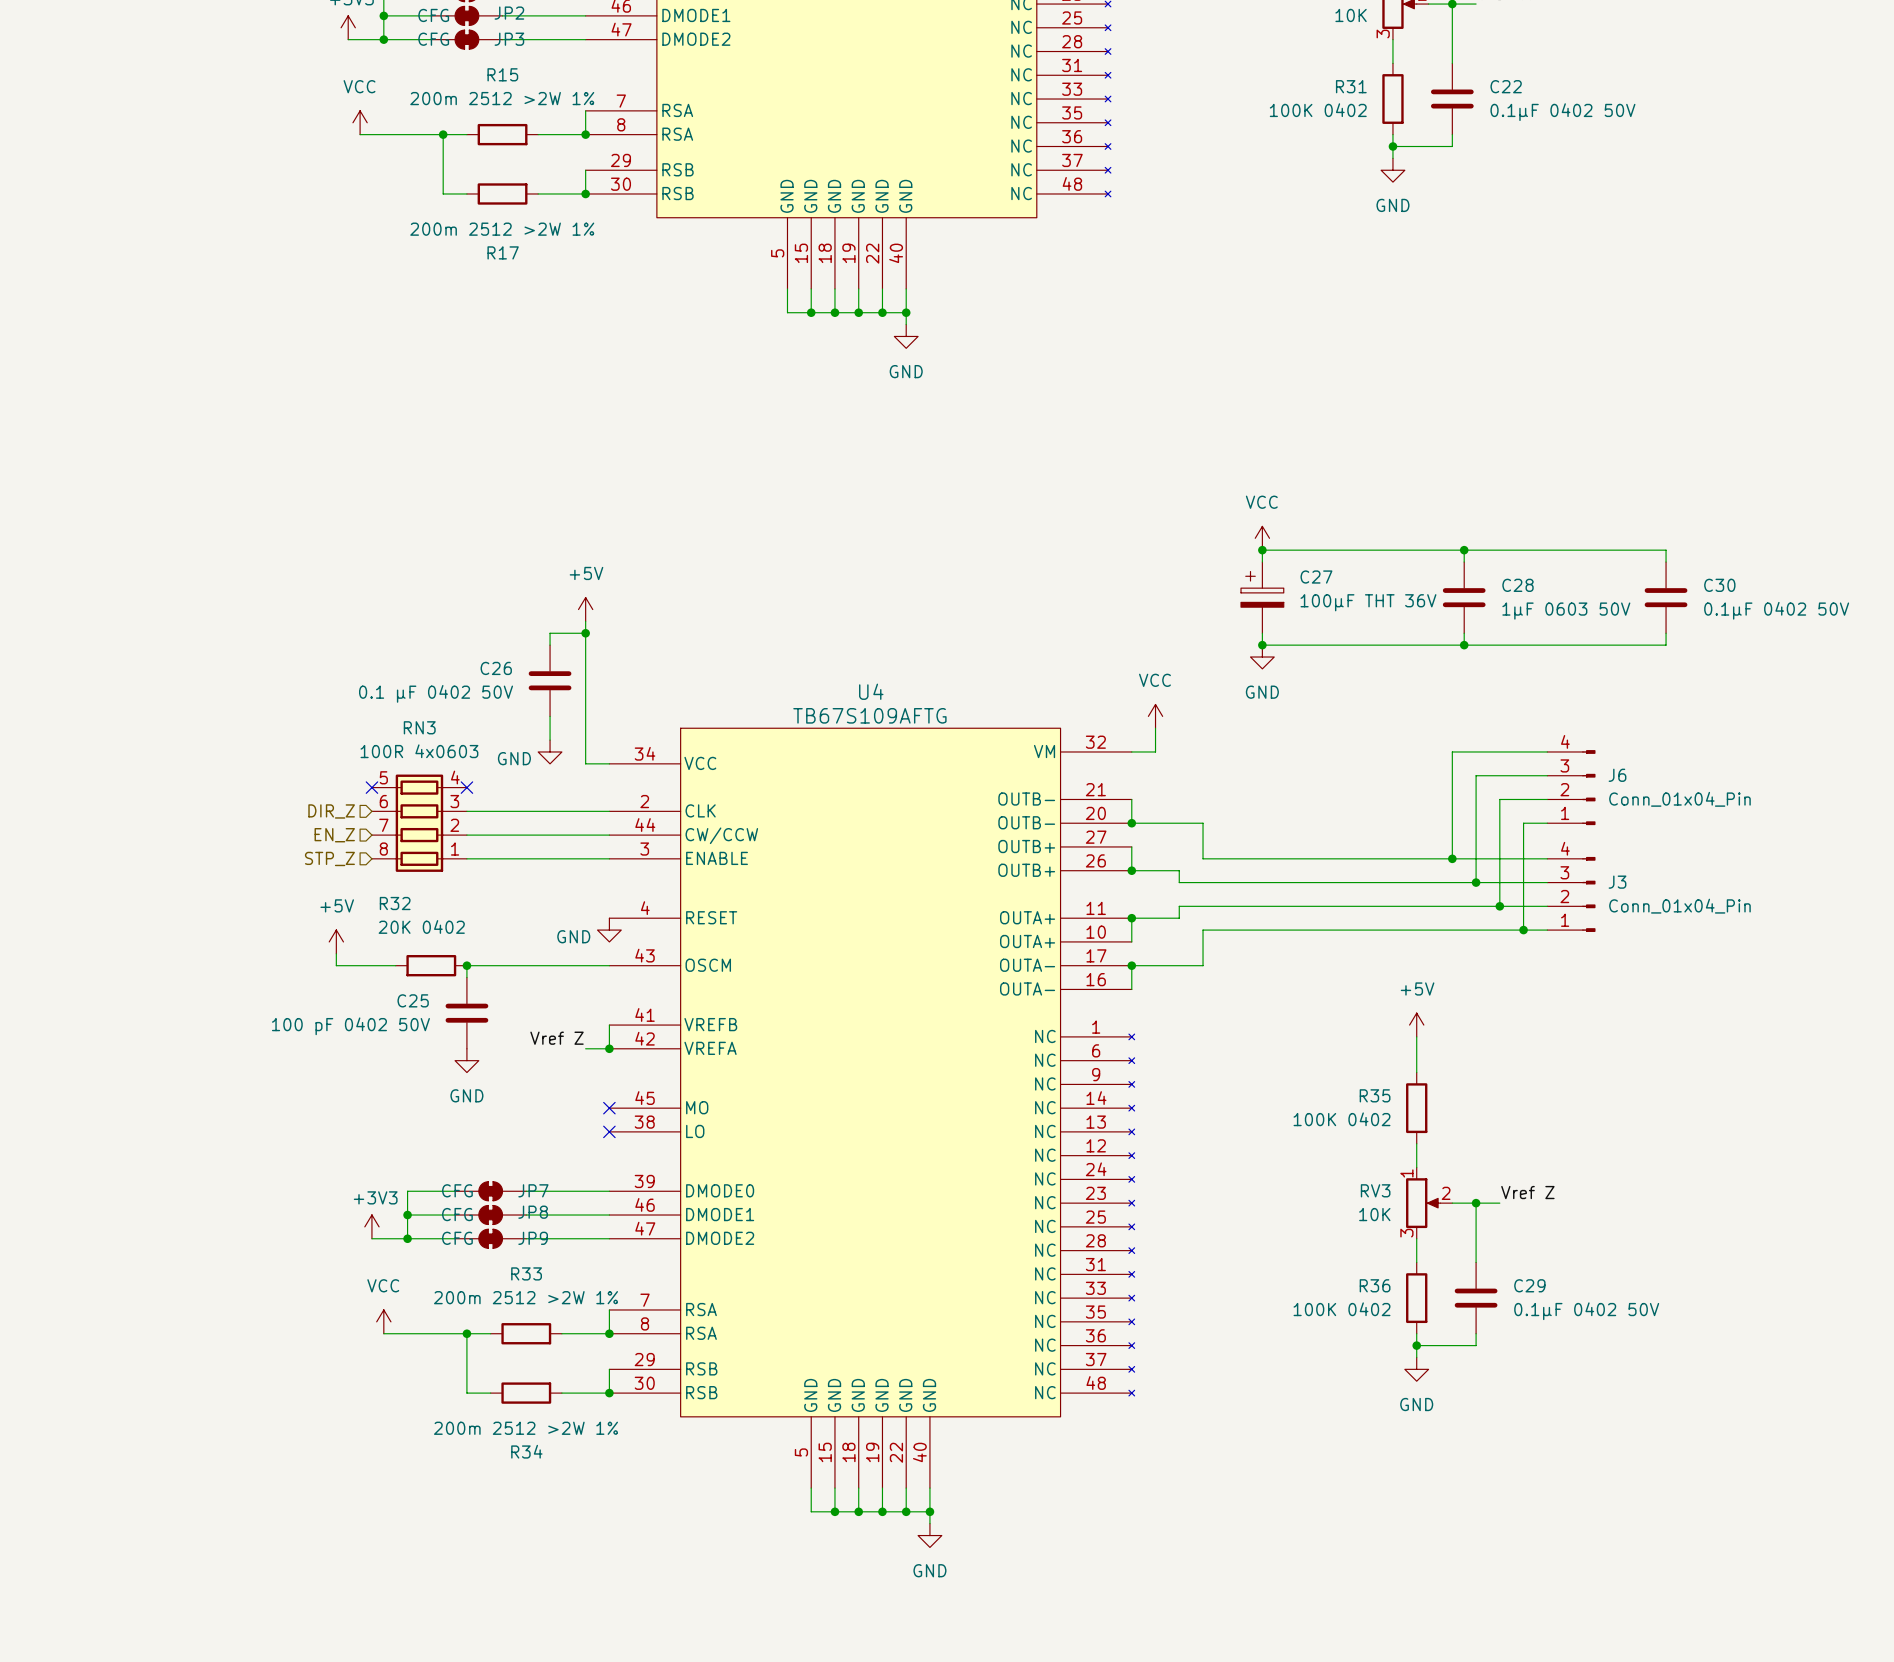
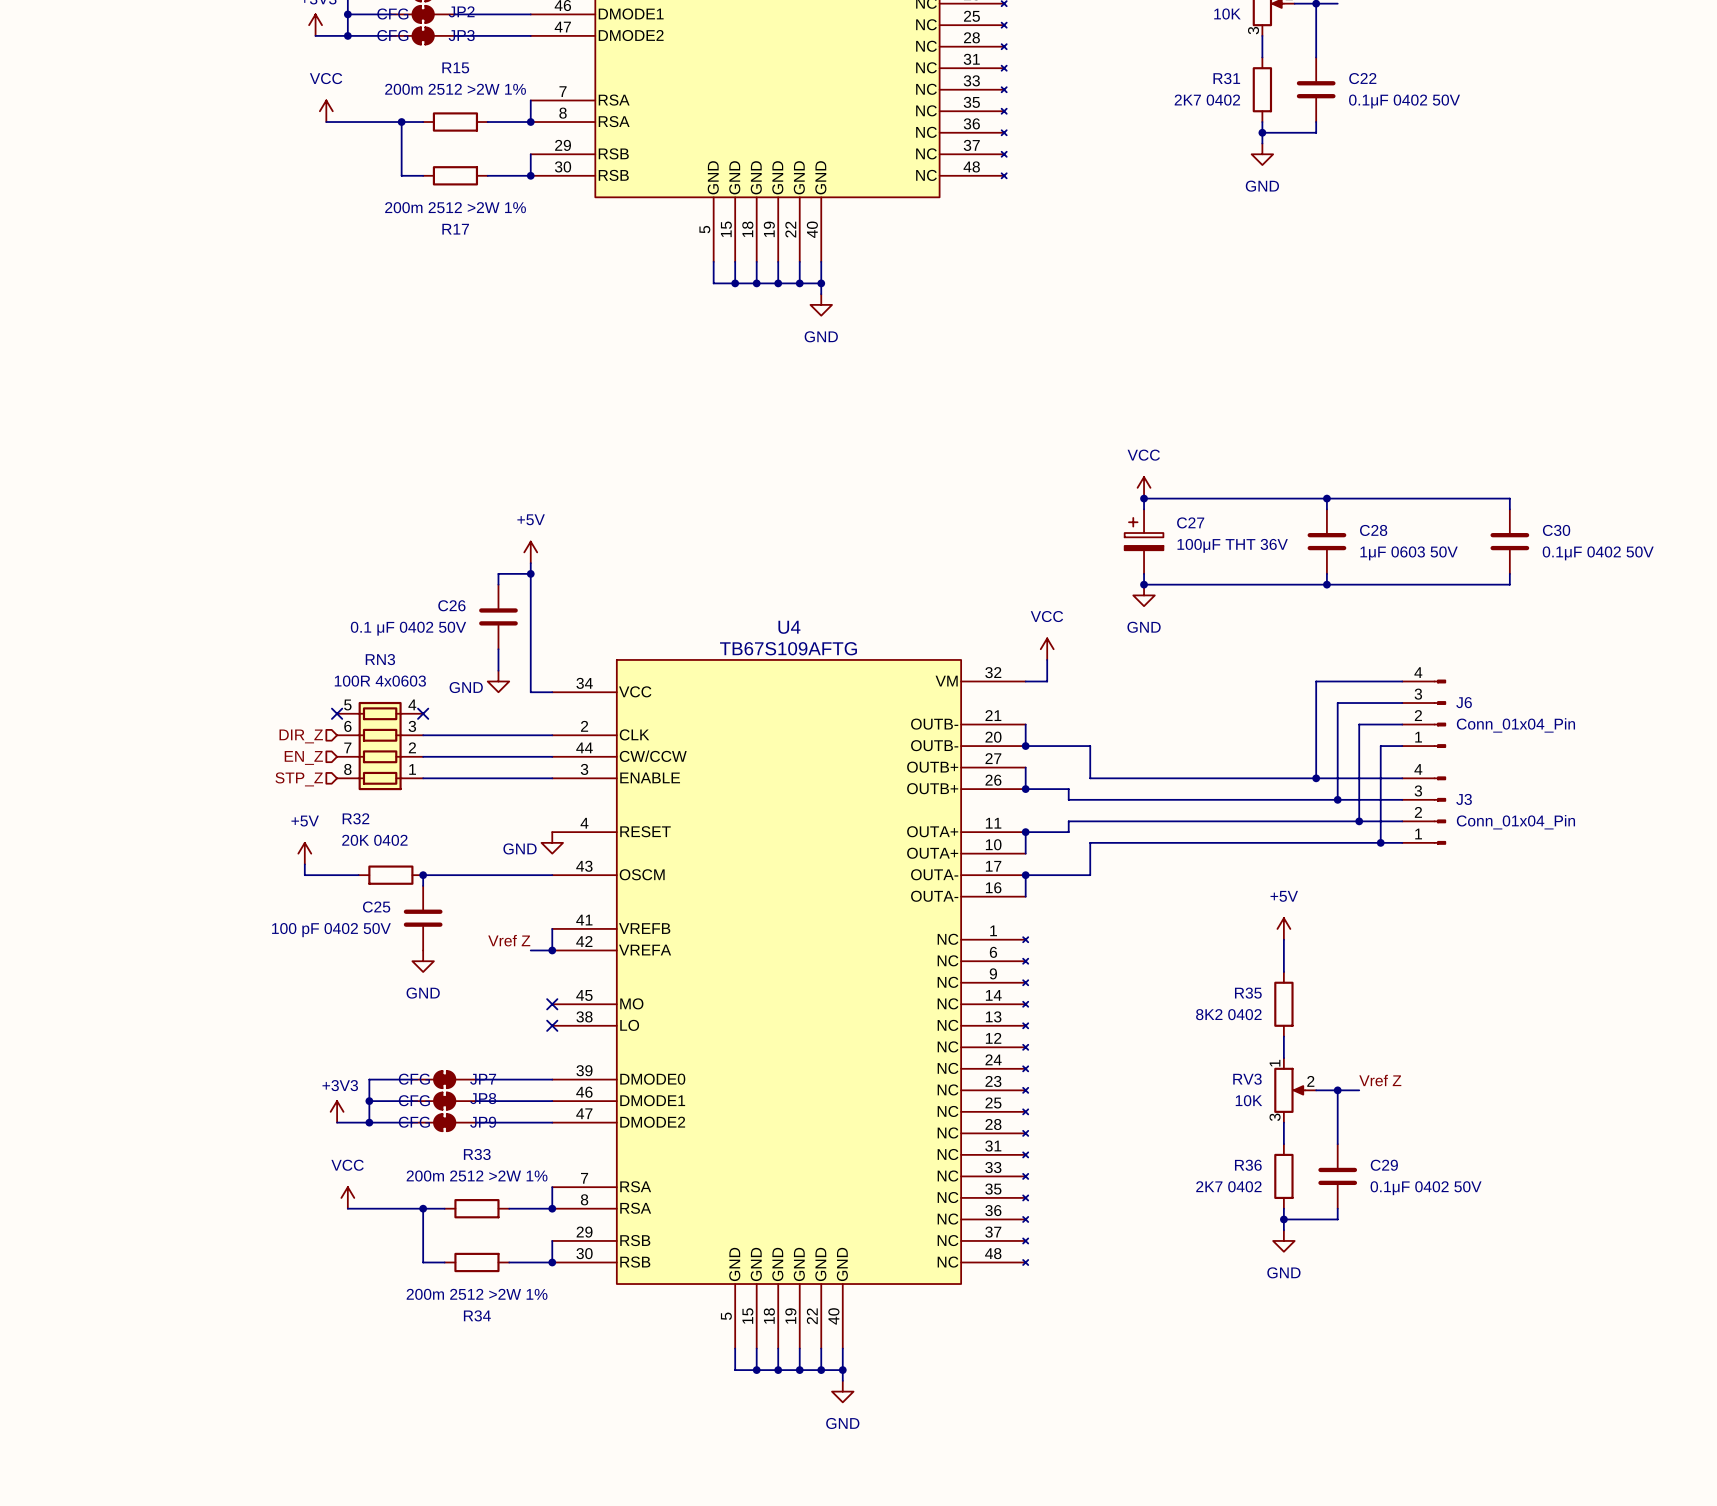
R31 value: 100K 0402 (1318, 110) -> 2K7 0402 (1207, 100)
R35 value: 100K 0402 (1342, 1119) -> 8K2 0402 (1228, 1014)
R36 value: 100K 0402 (1342, 1309) -> 2K7 0402 (1228, 1186)

